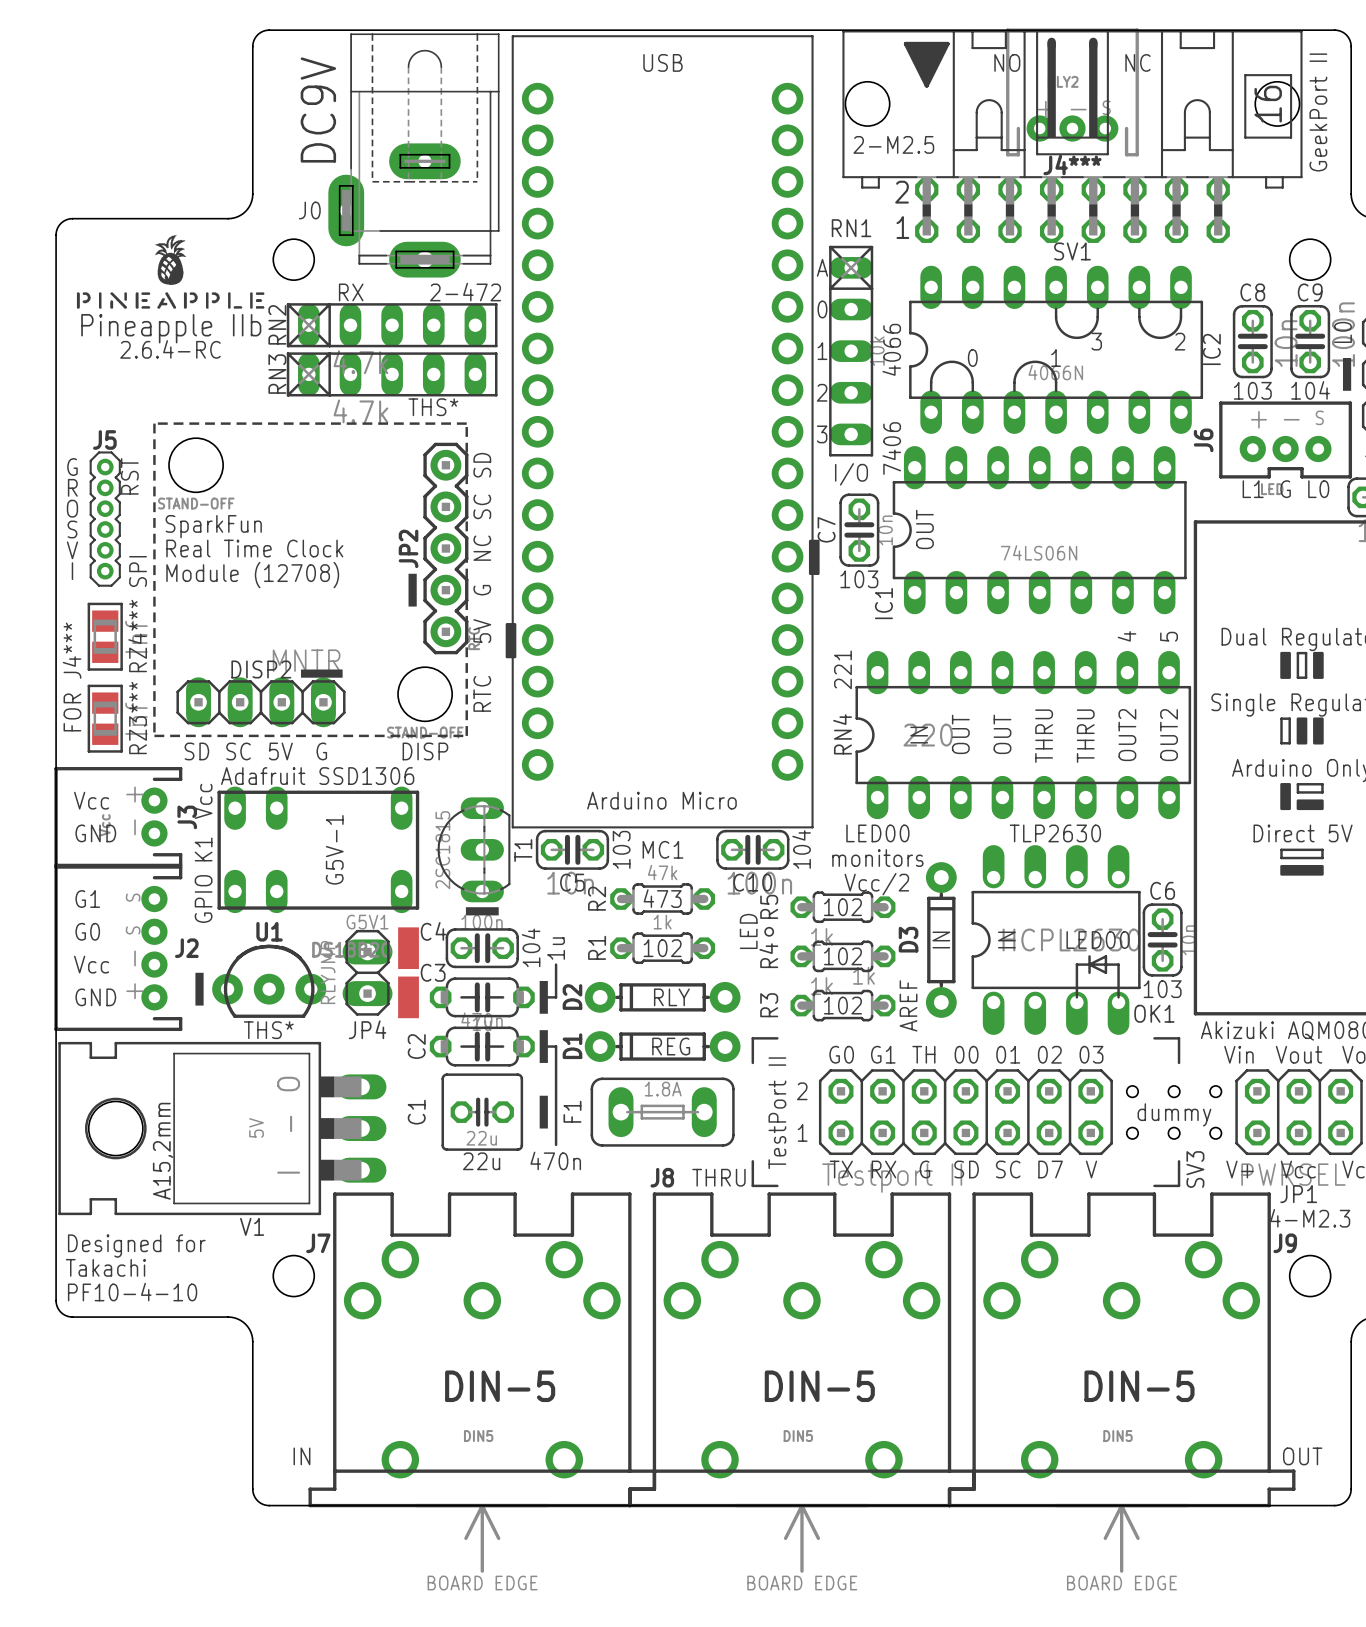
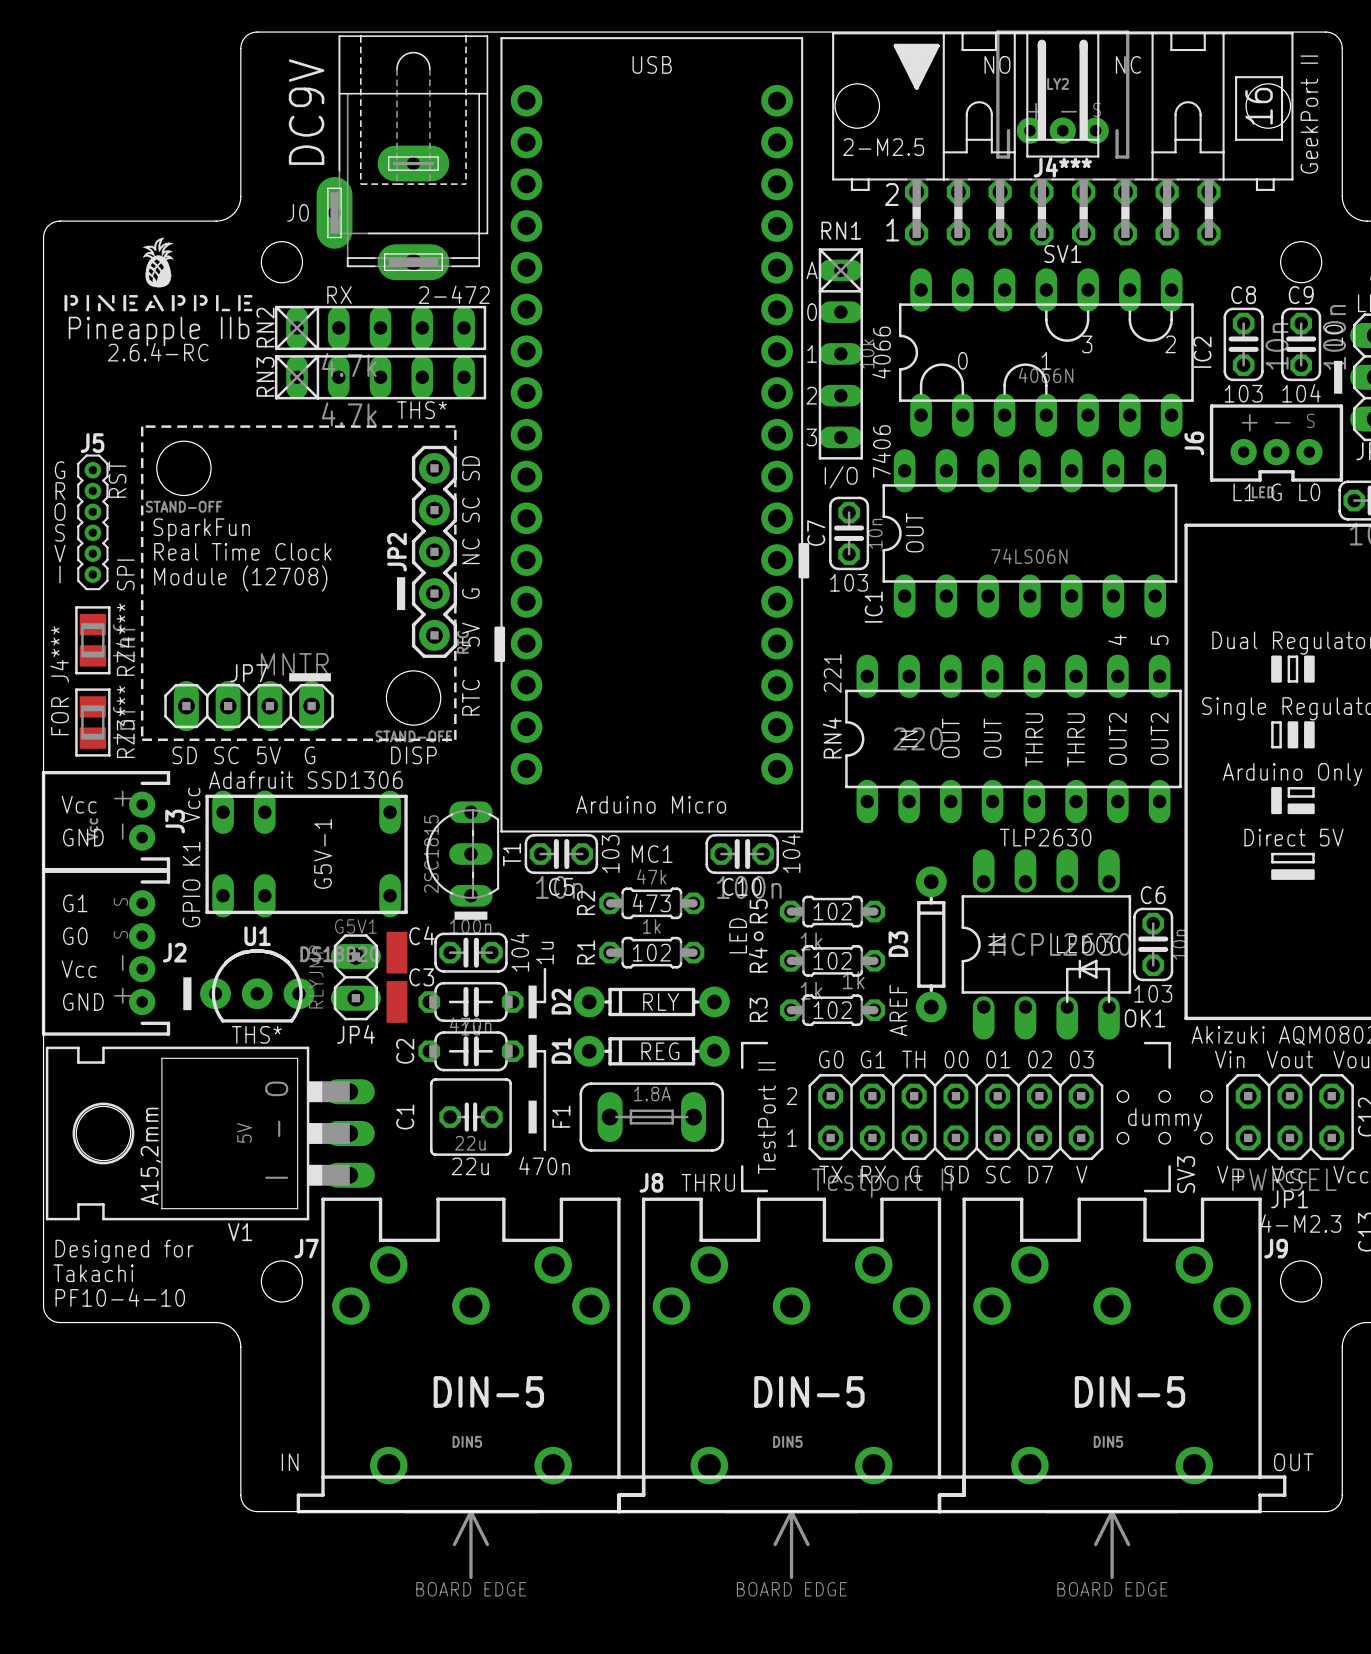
DISP2 name: DISP2 (261, 669) -> JP7 (249, 673)
text: LED00 (877, 833) -> none
text: monitors (877, 858) -> none
text: Vcc/2 (876, 884) -> none
text: IN (941, 939) -> none

